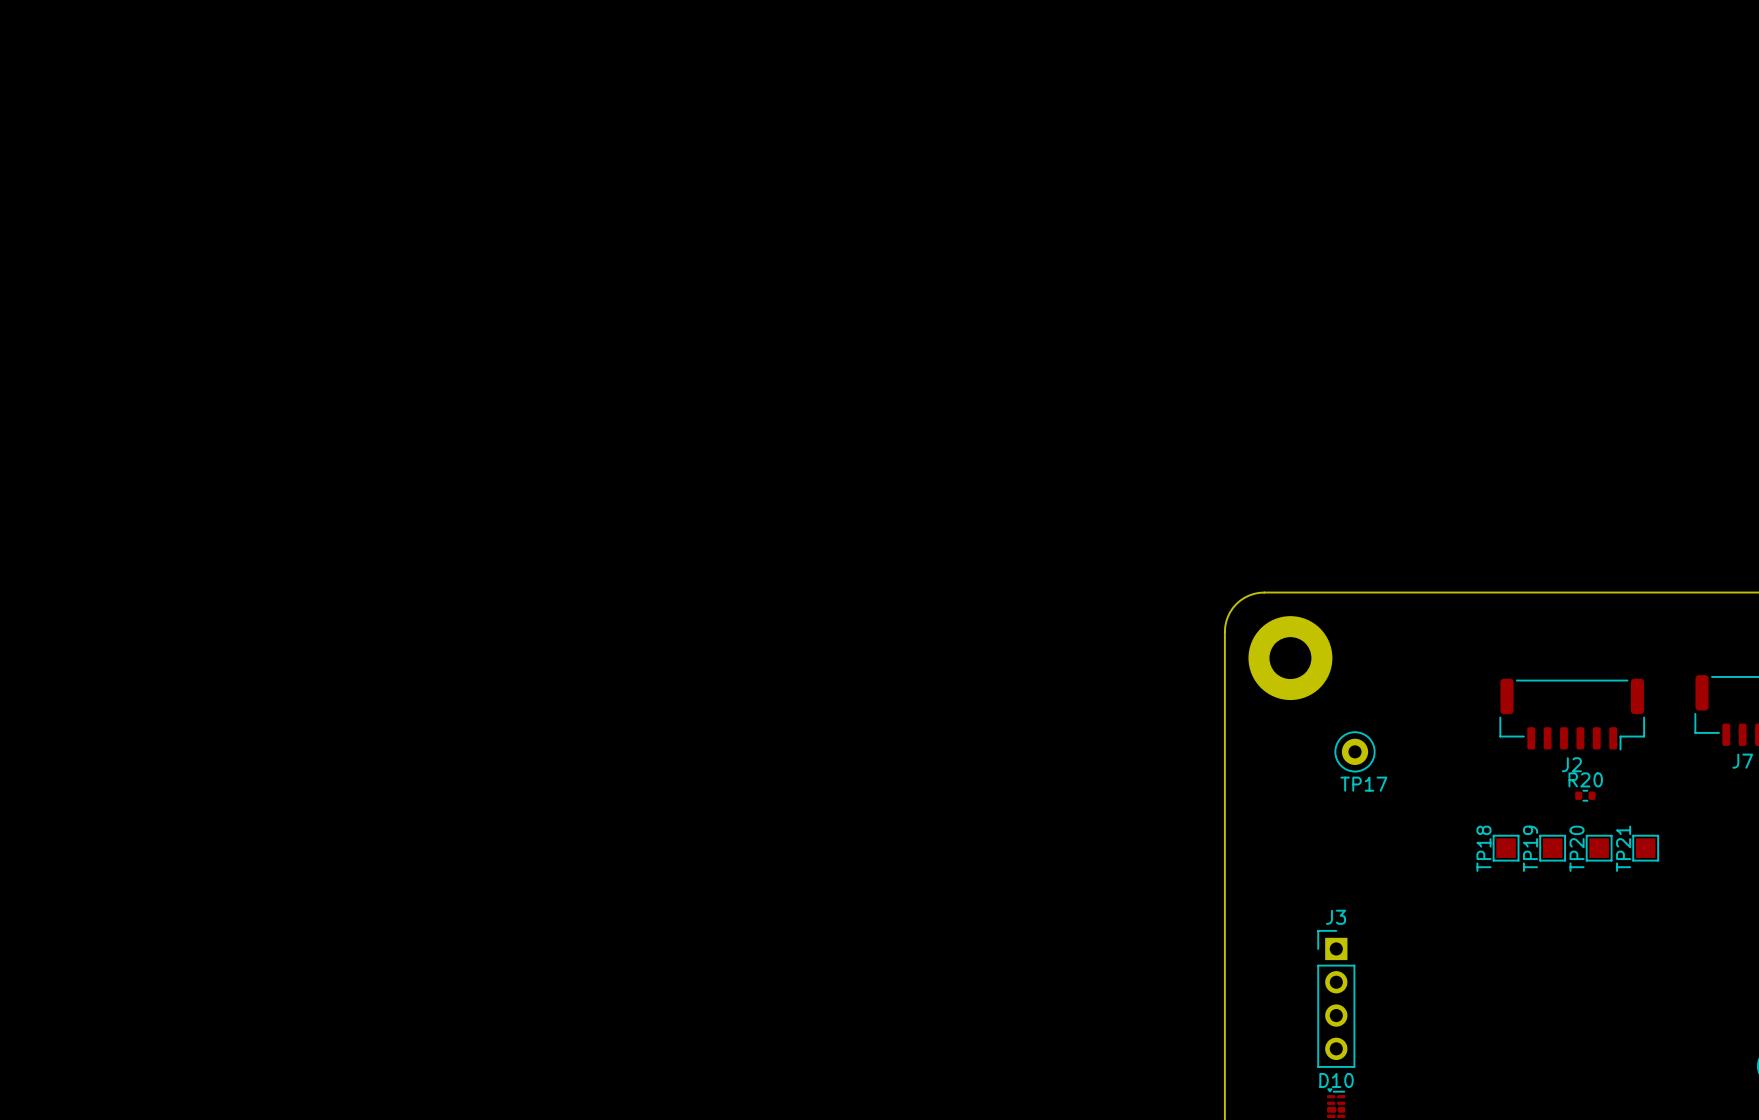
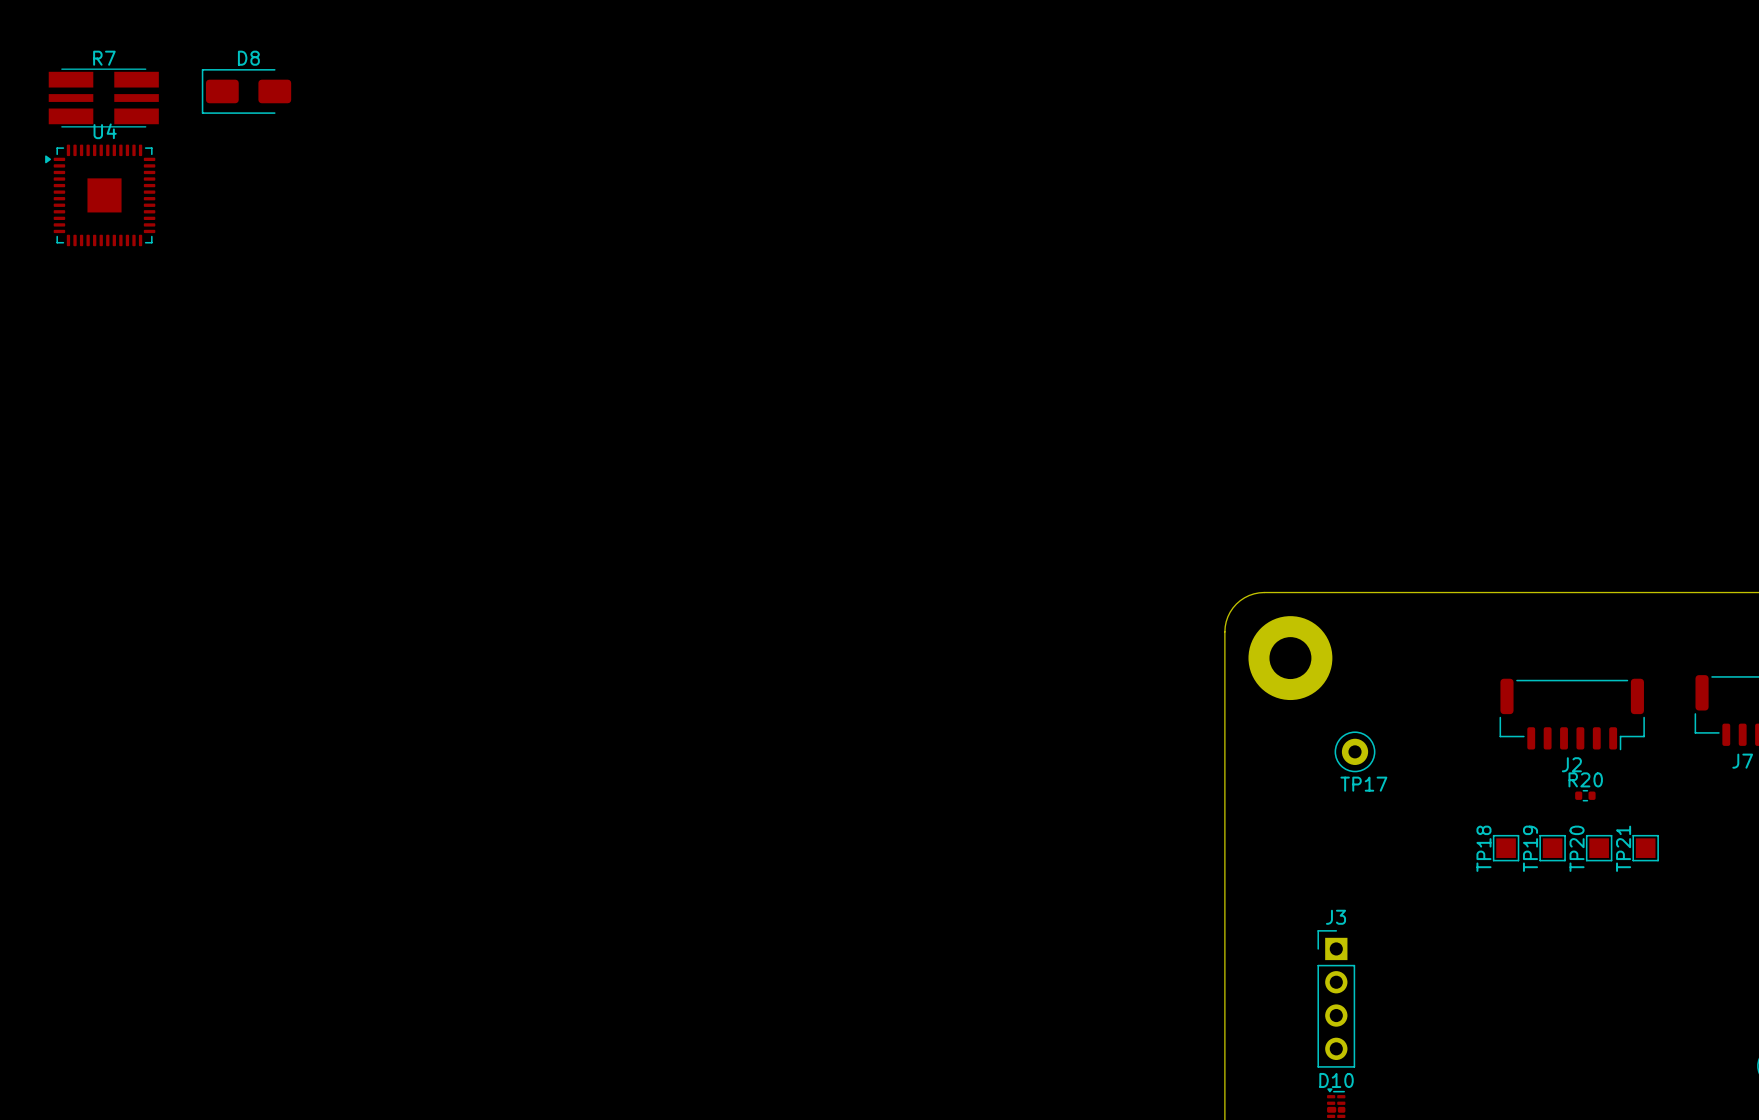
D8: none -> (246, 91)
R7: none -> (103, 98)
U4: none -> (100, 195)

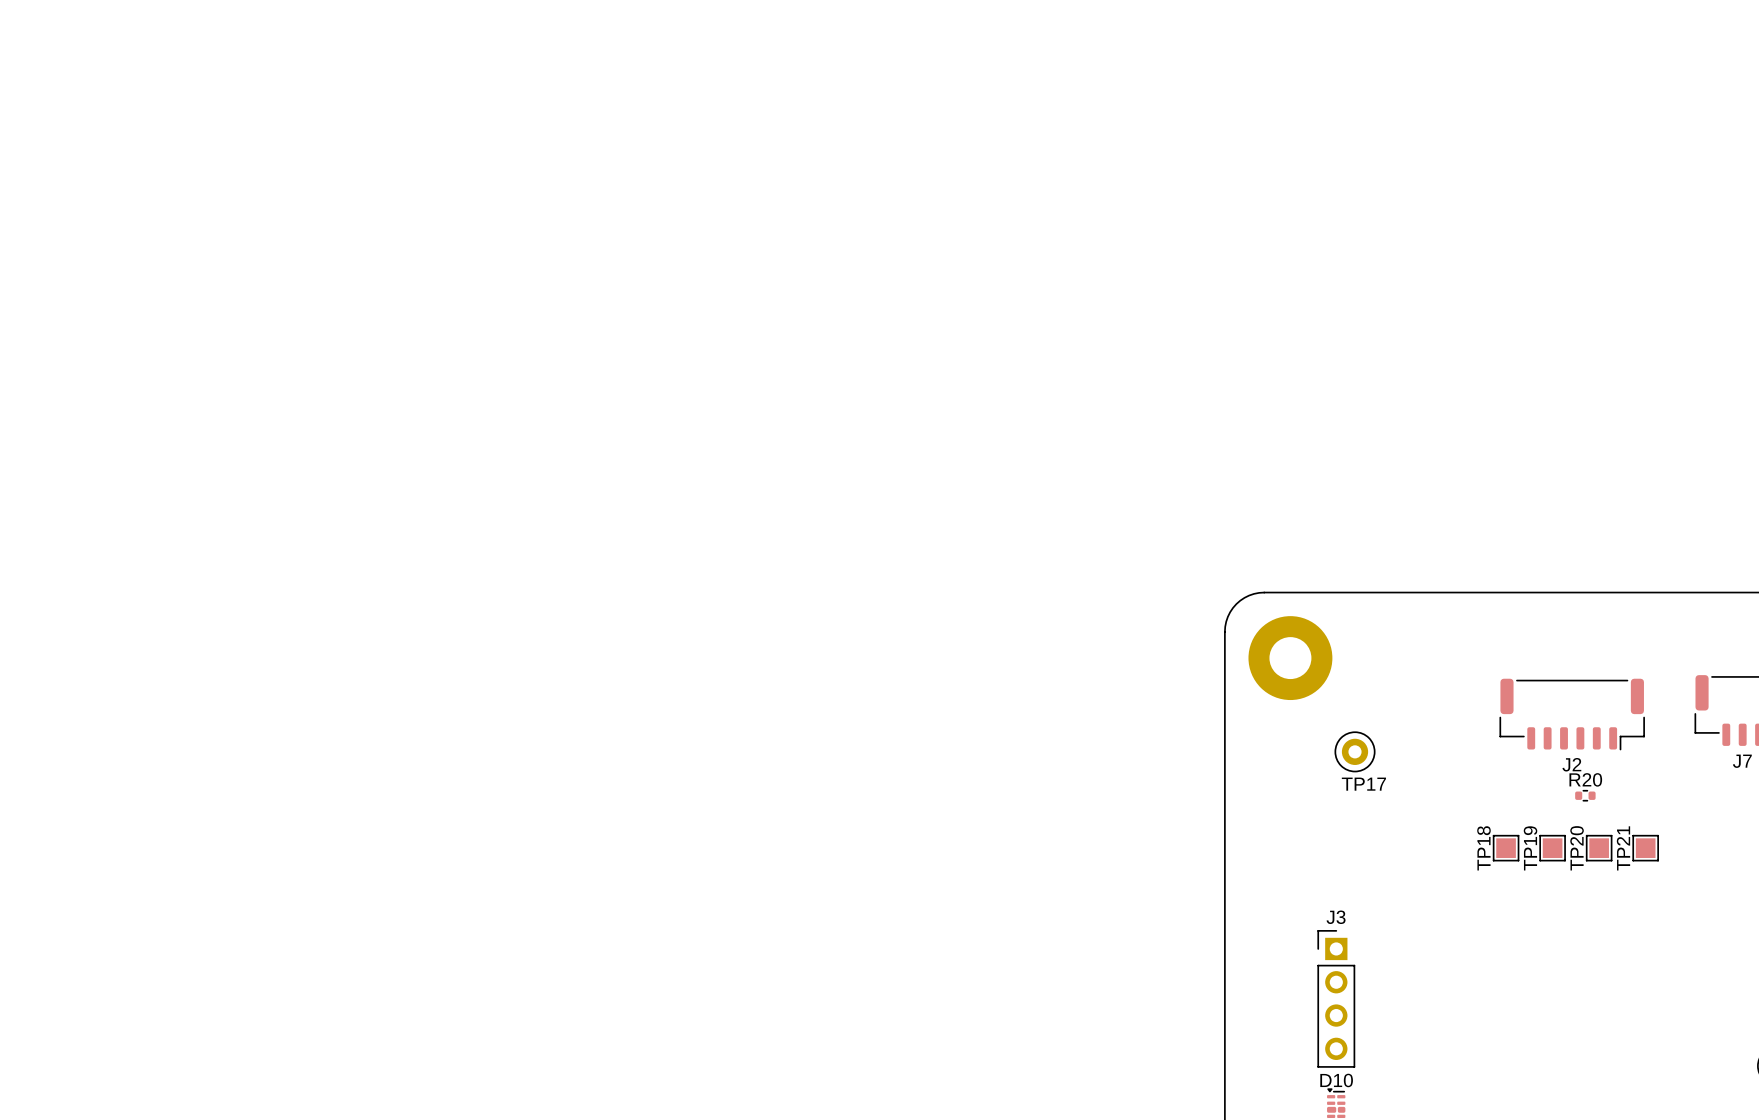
D8: (246, 91) -> none
R7: (103, 98) -> none
U4: (100, 195) -> none

